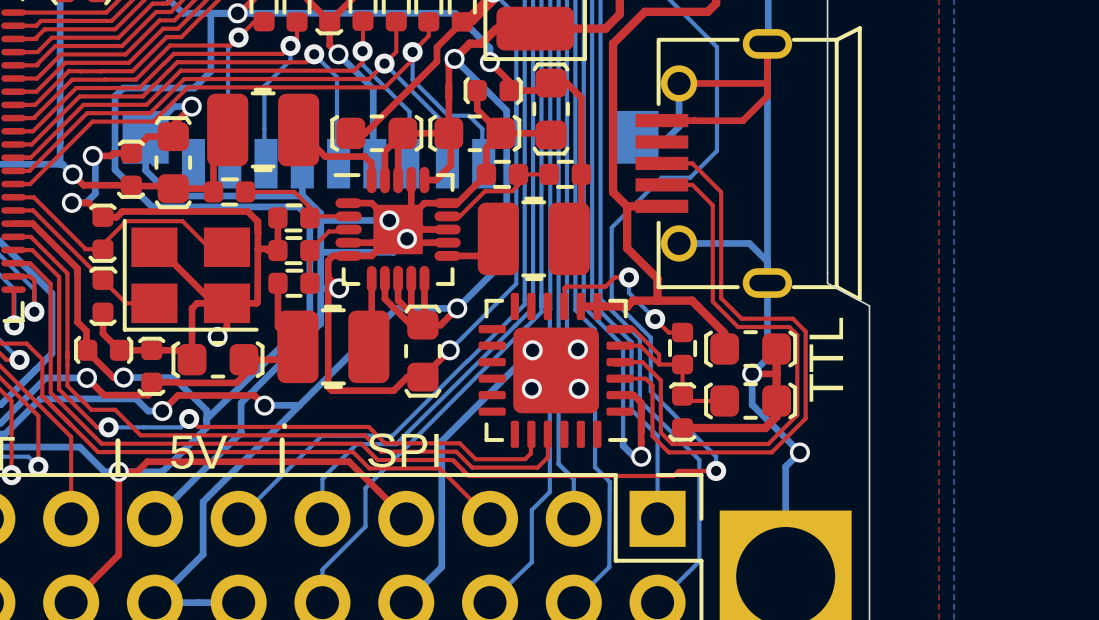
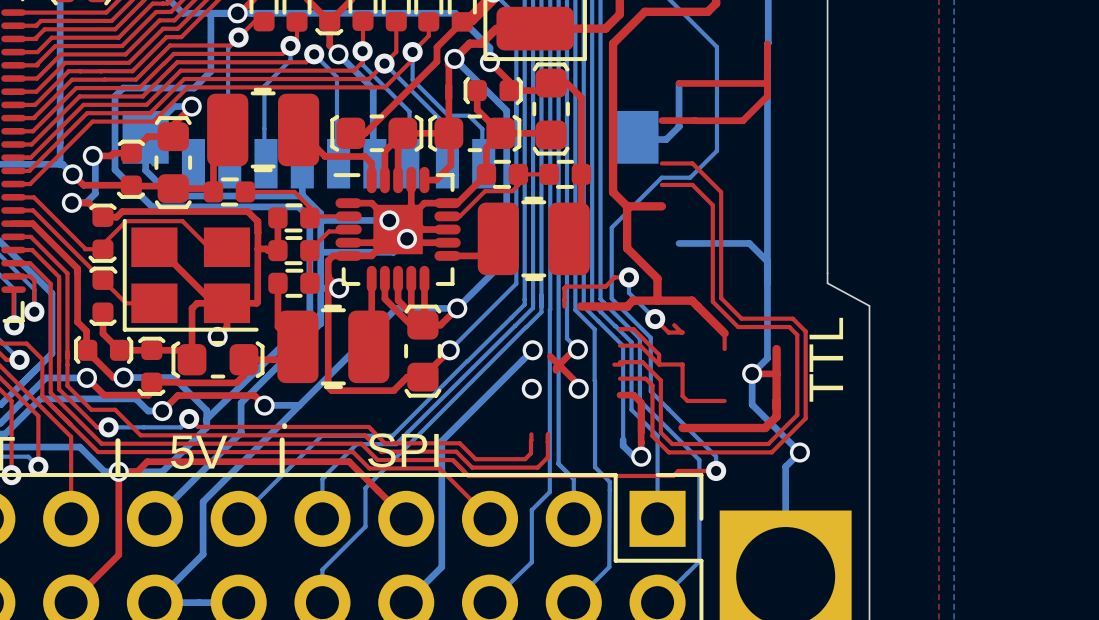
part: (748, 163) -> none
part: (682, 348) -> none
part: (750, 349) -> none
part: (556, 370) -> none
part: (750, 400) -> none
part: (682, 412) -> none

